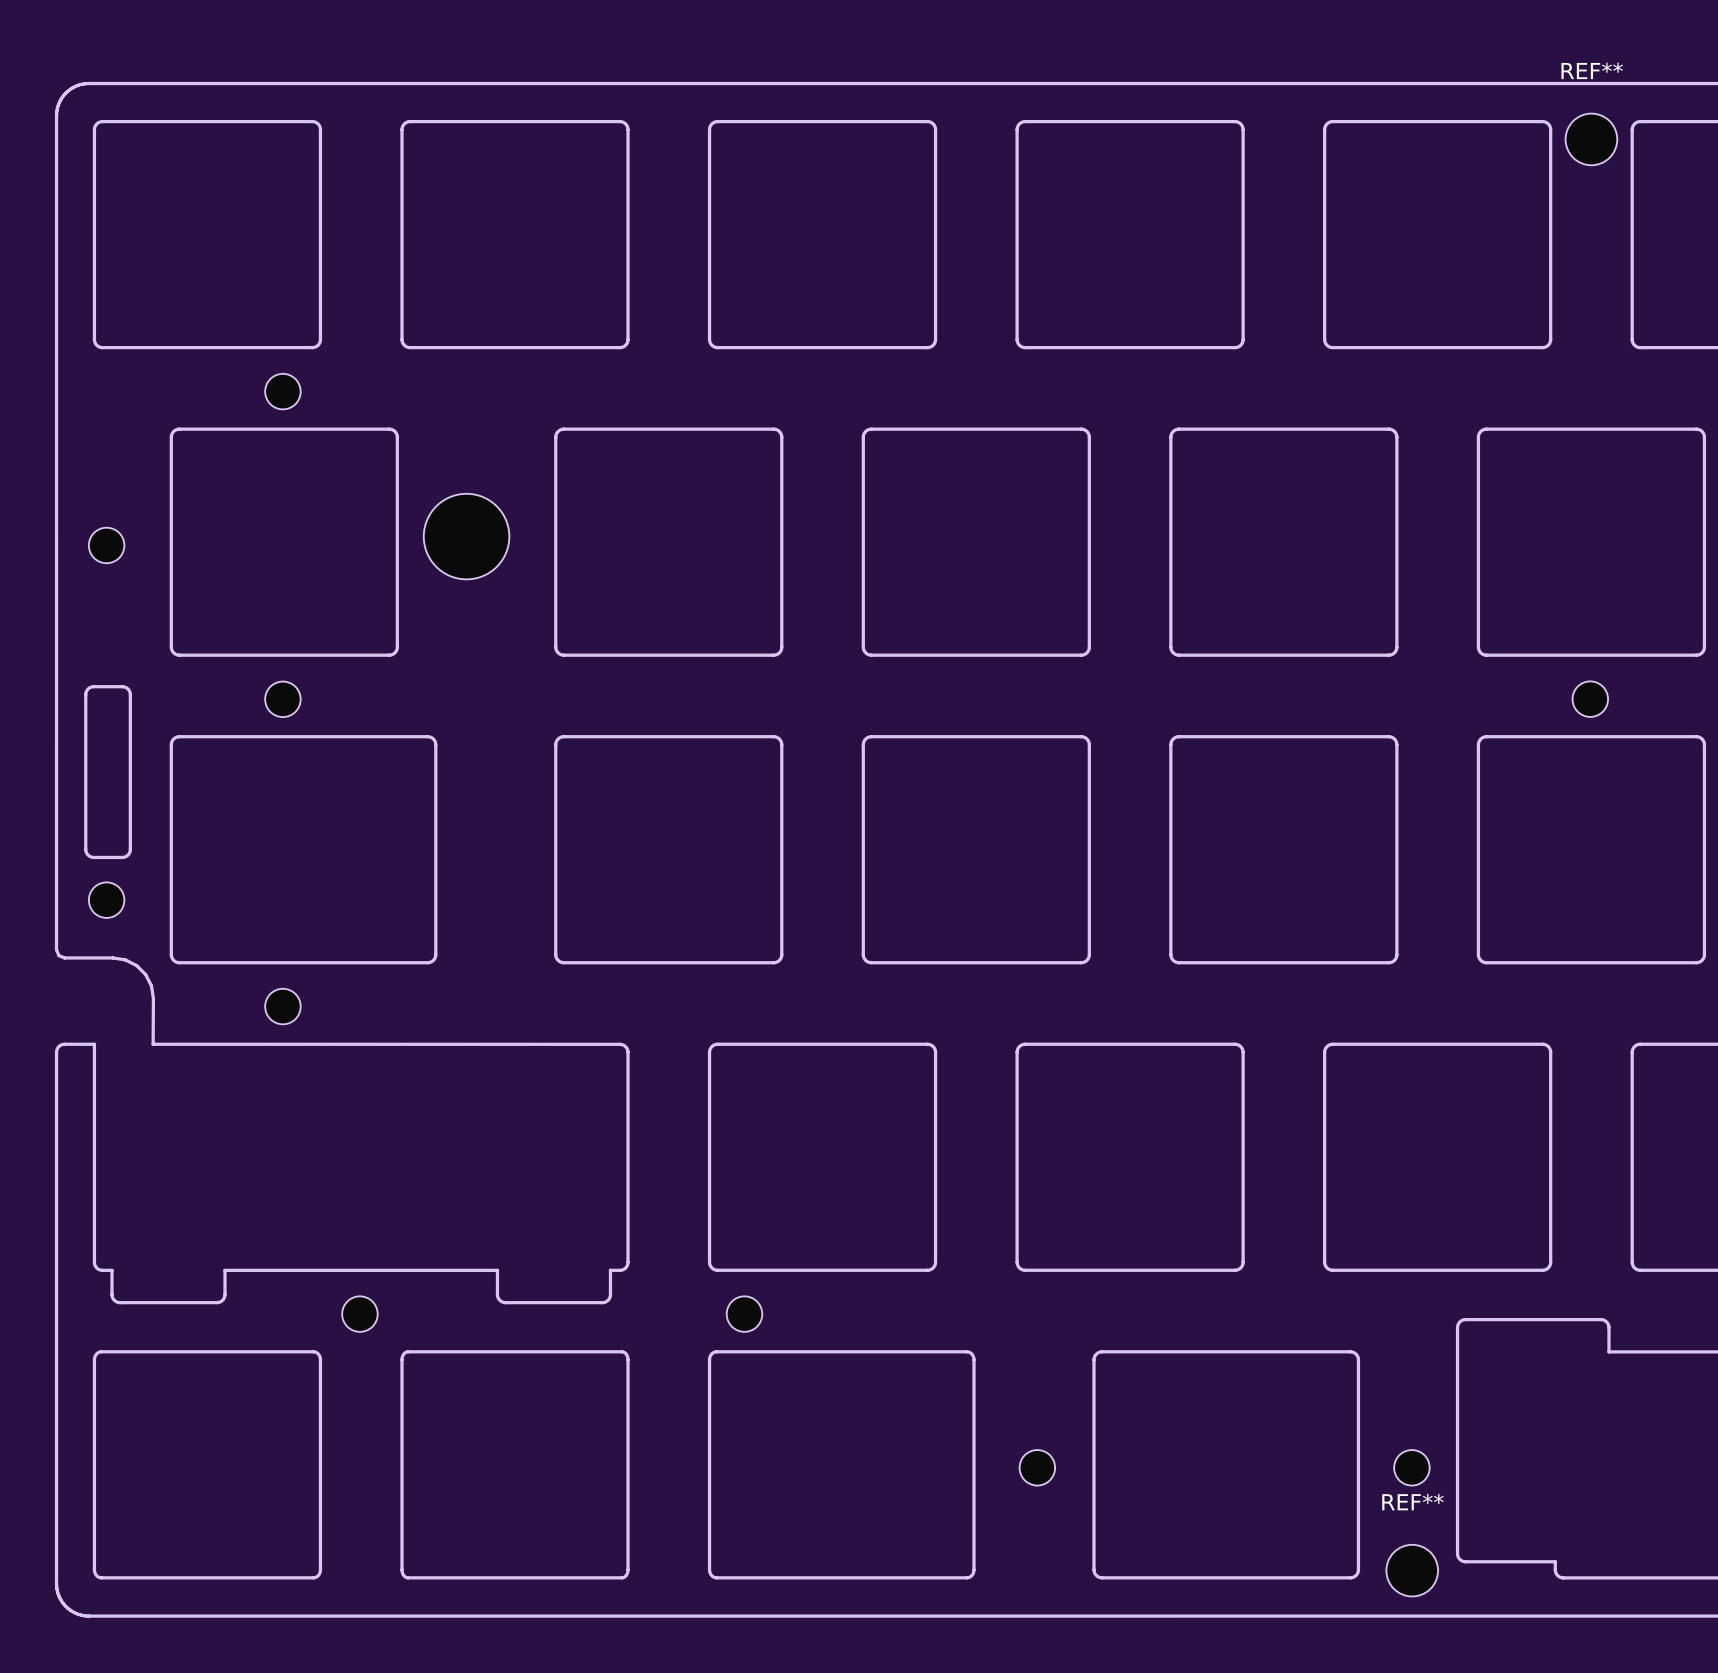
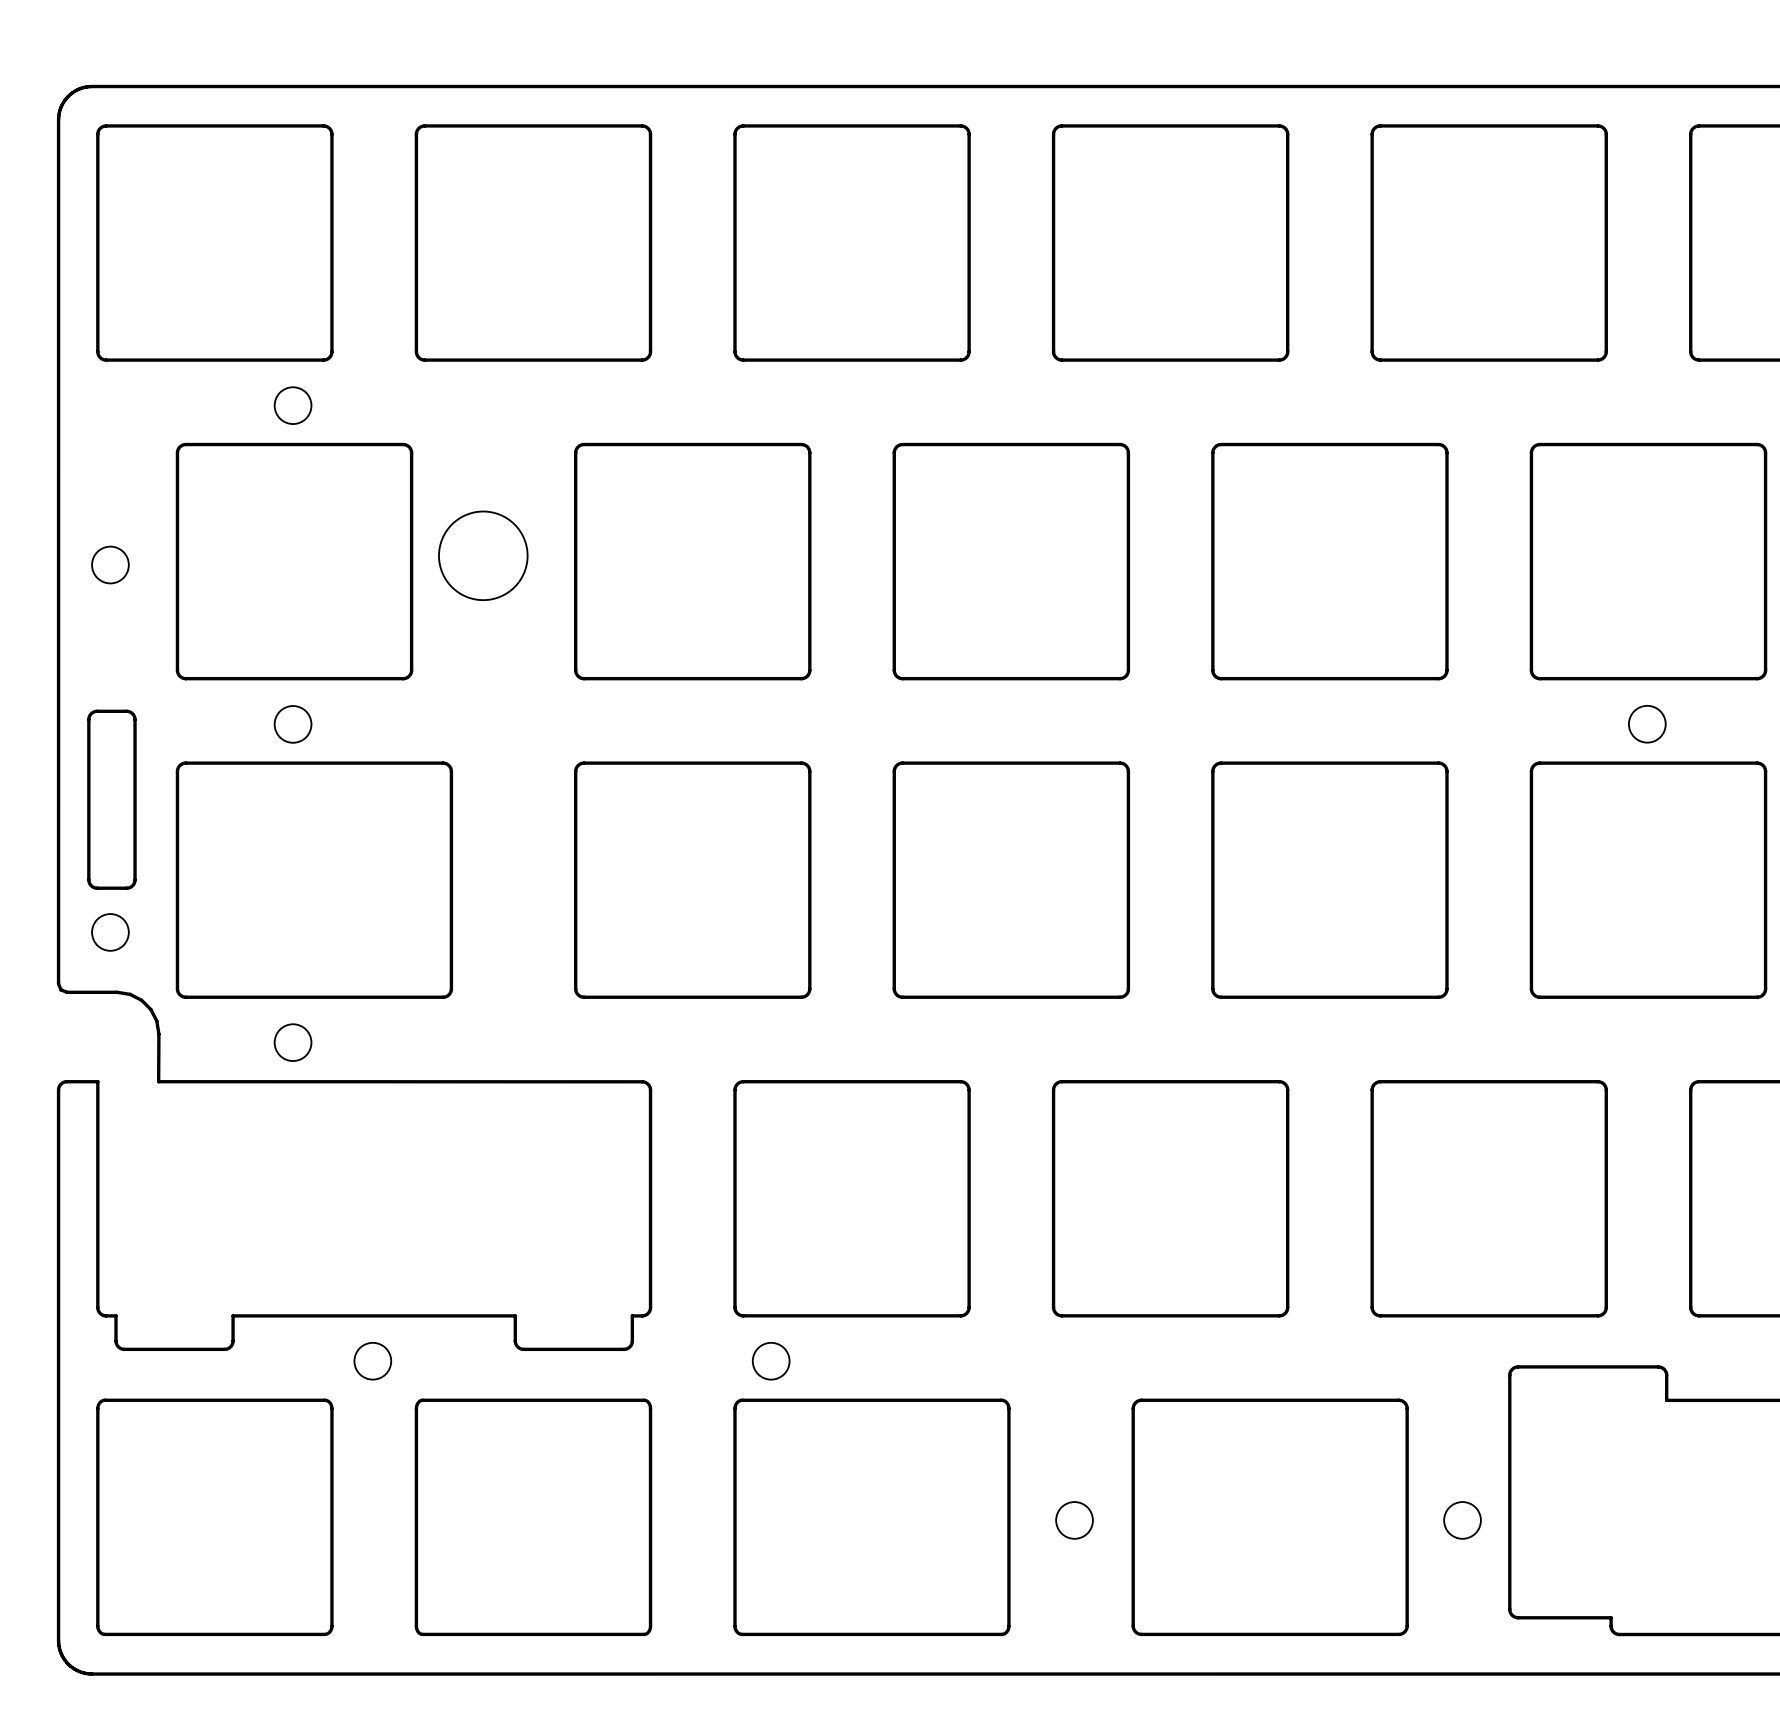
REF**: (1591, 139) -> none
REF**: (1412, 1570) -> none

